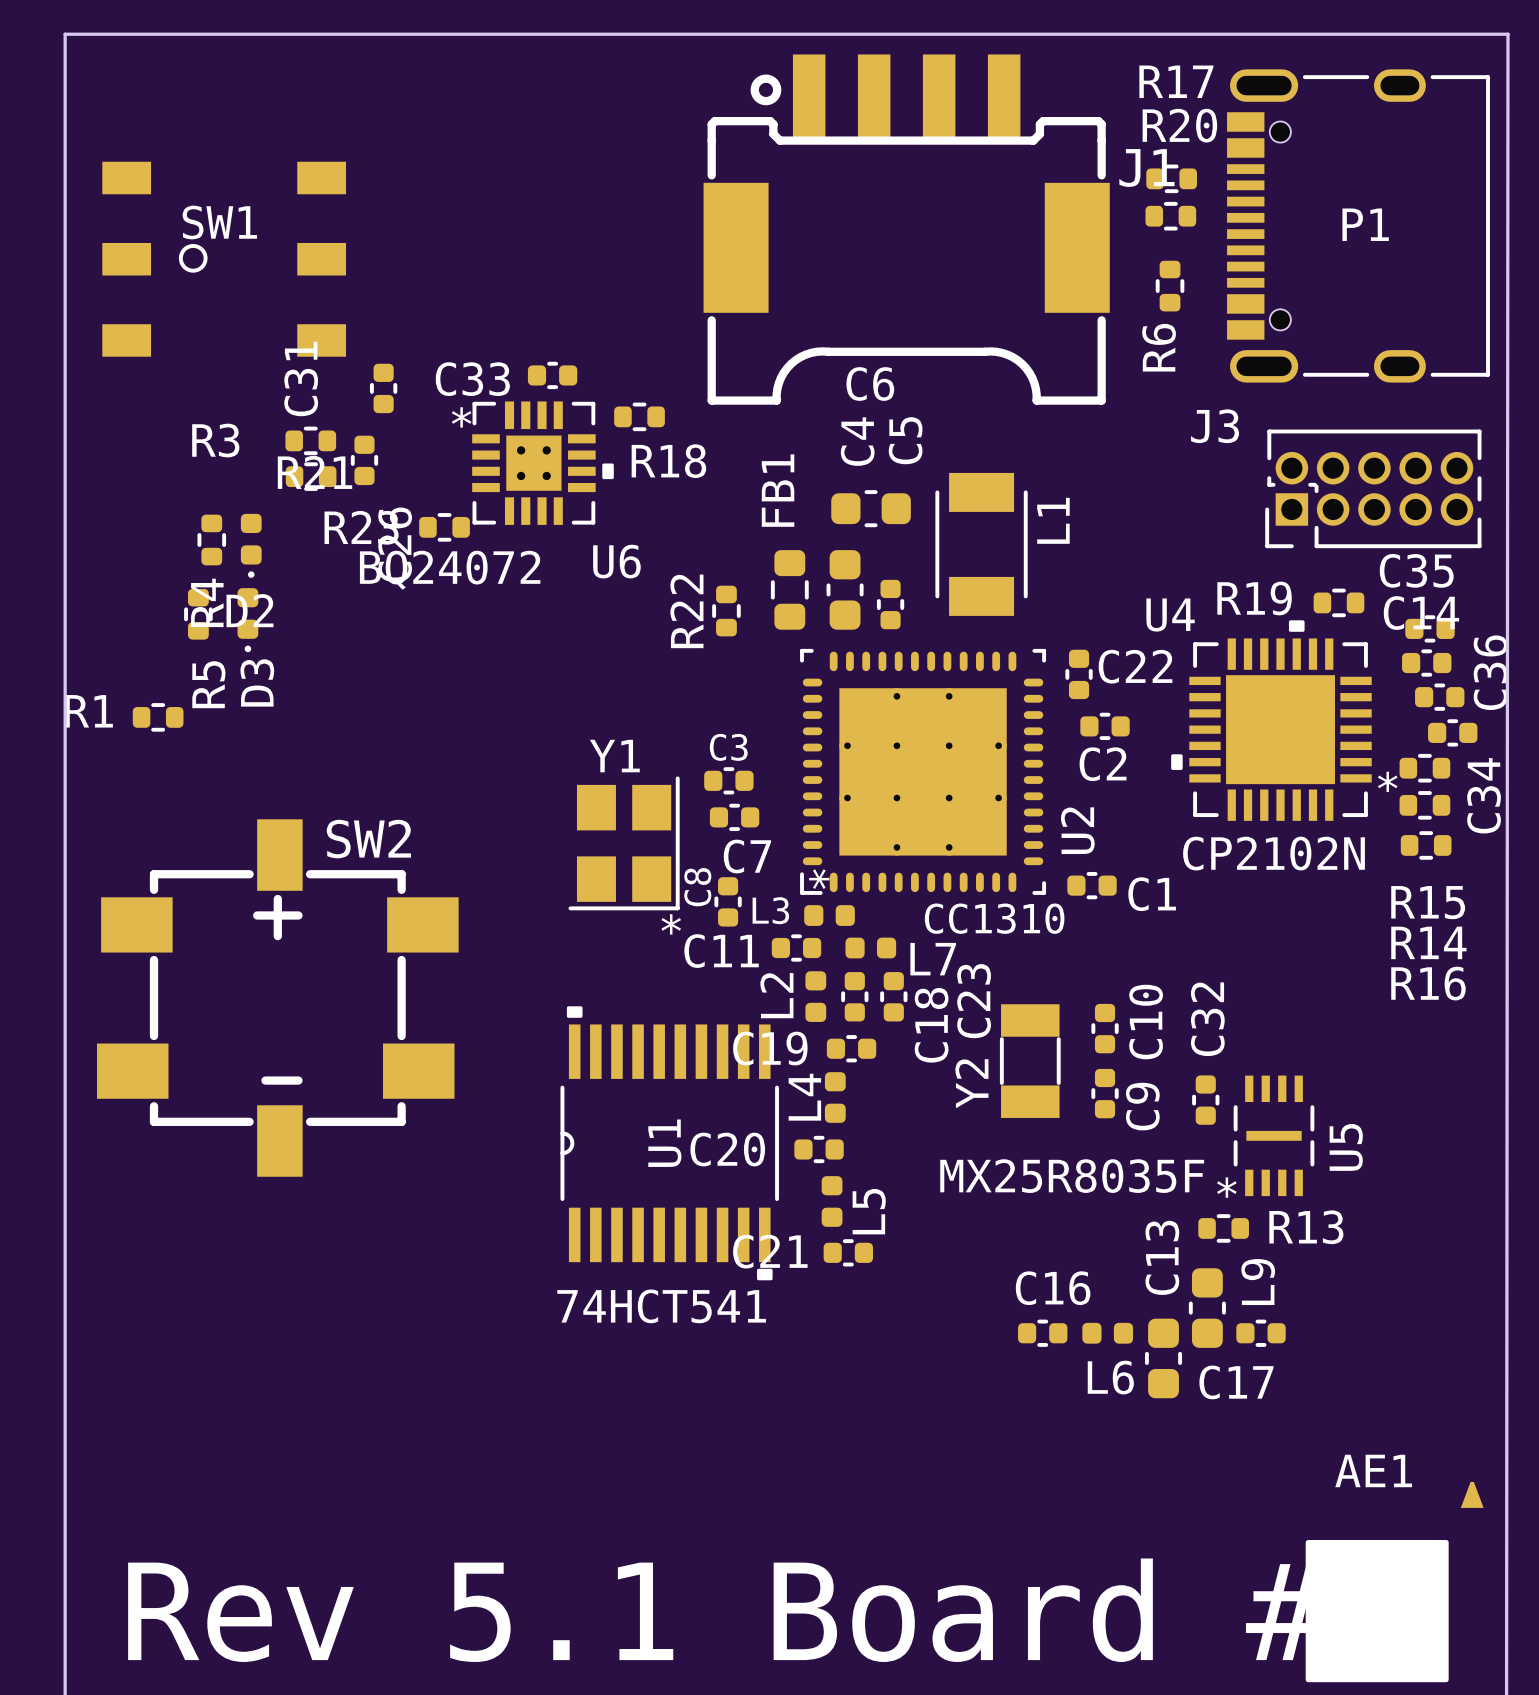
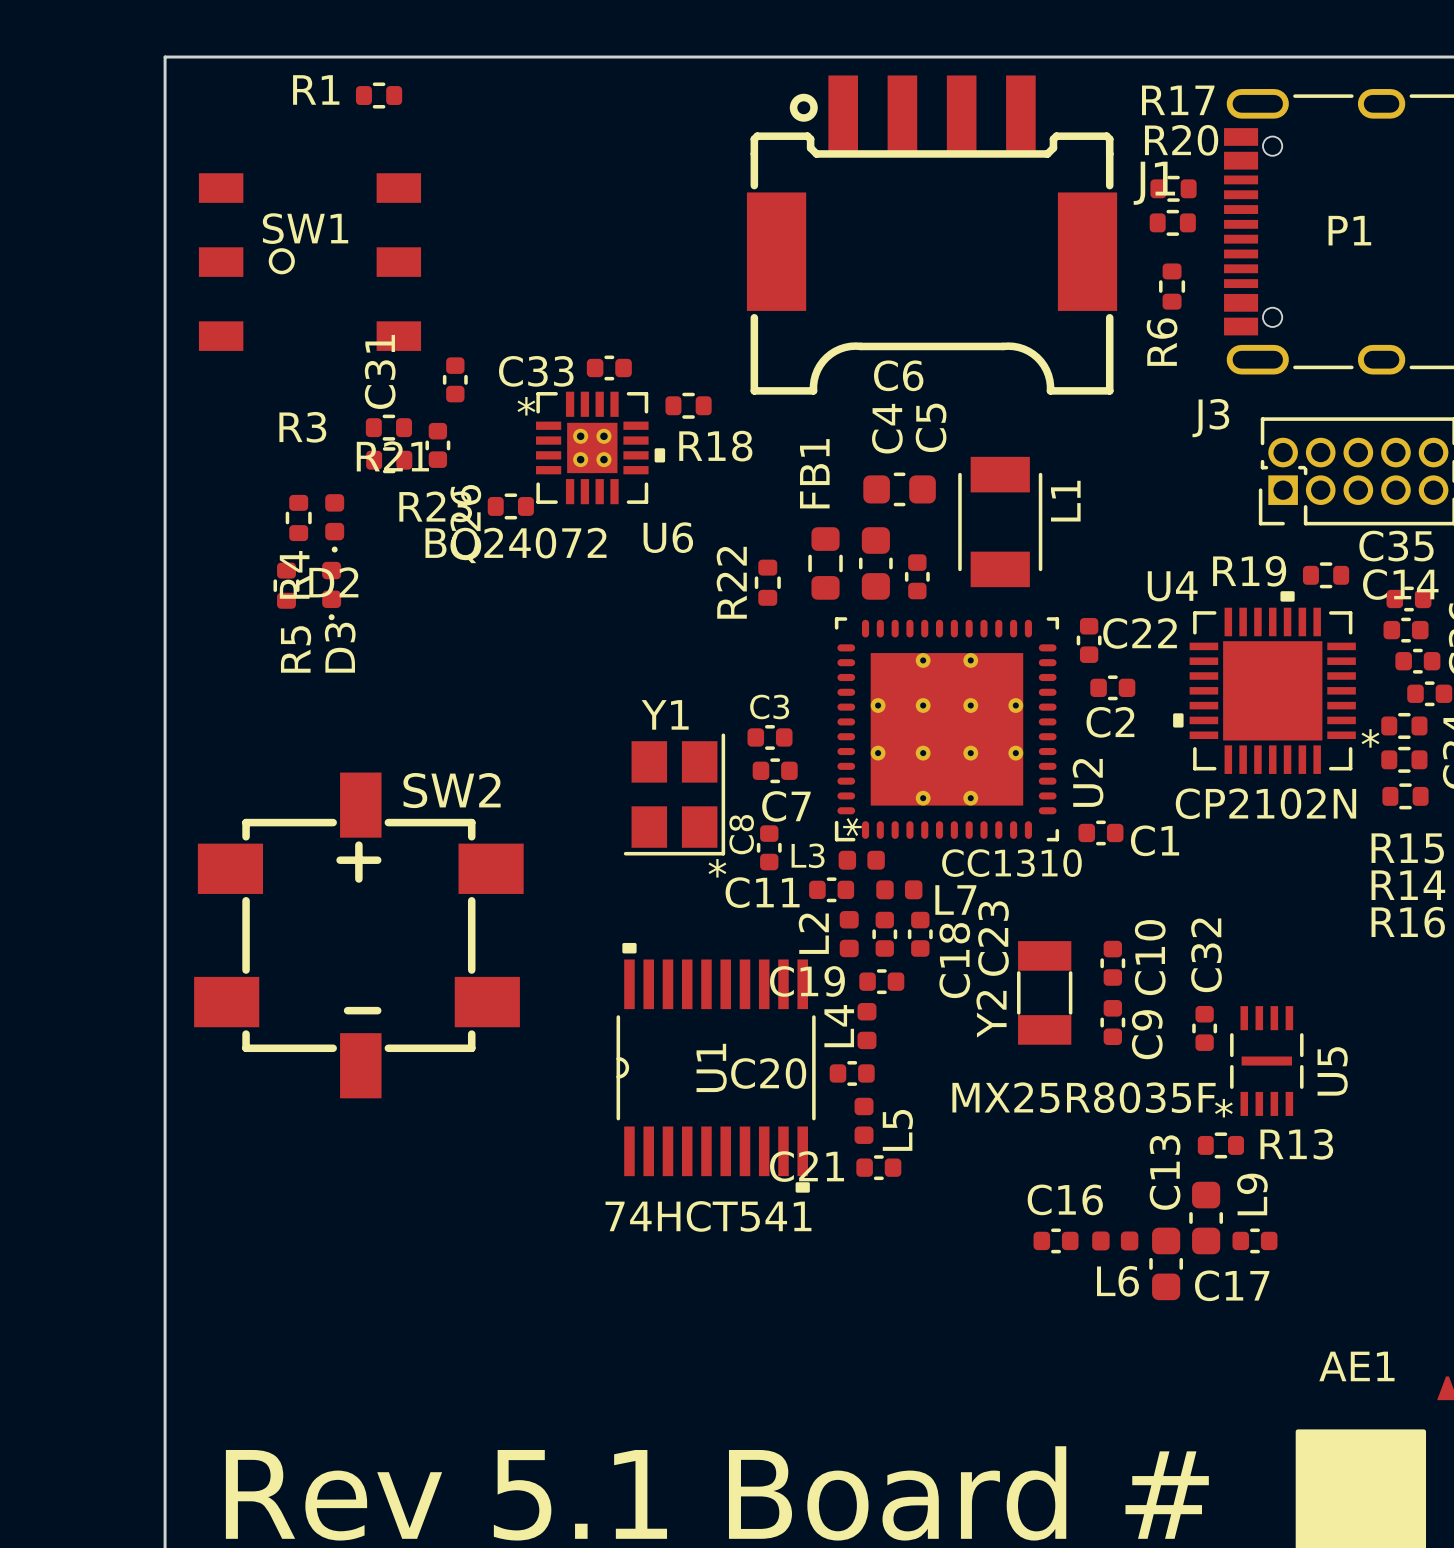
R1 position: (158, 717) -> (379, 95)

